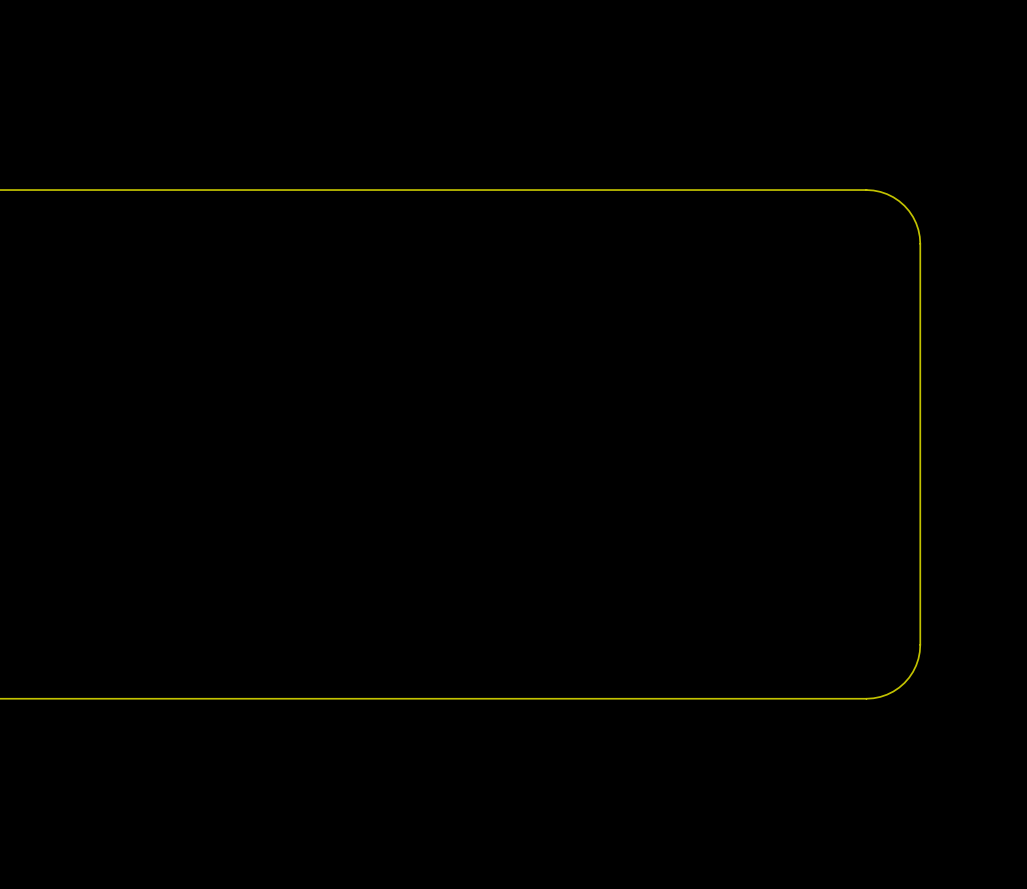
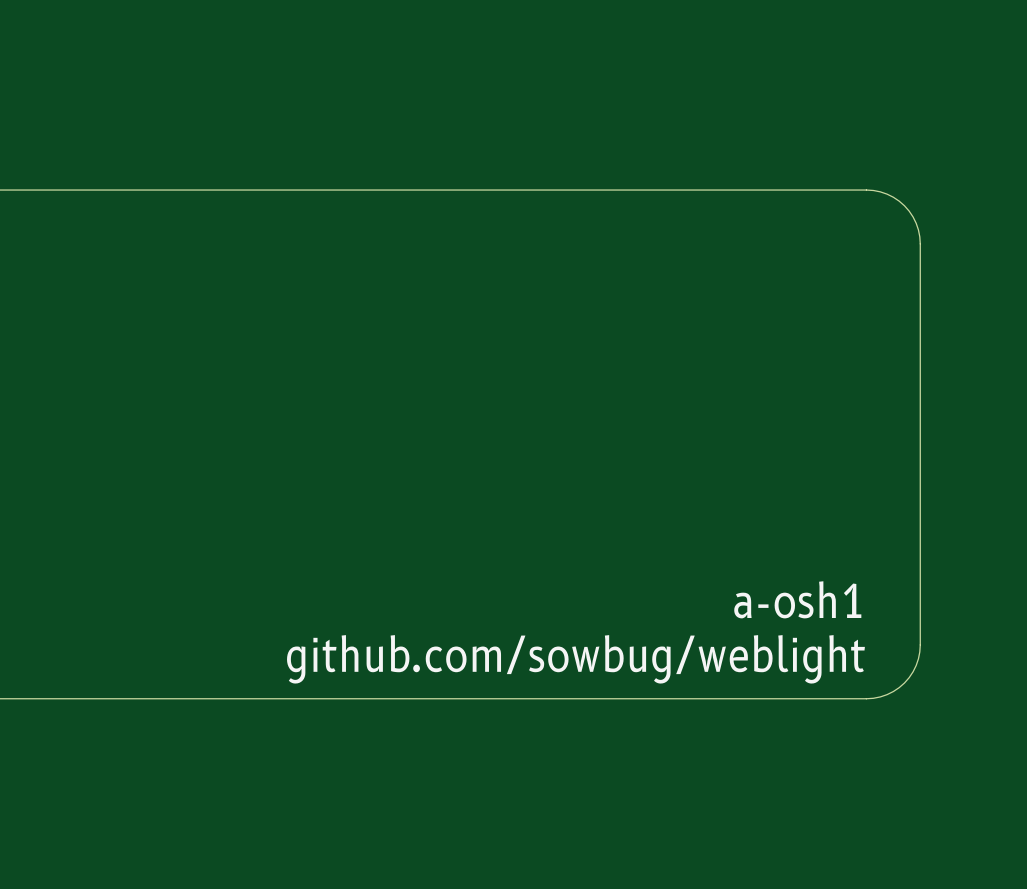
text: none -> a-osh1 (797, 599)
text: none -> github.com/sowbug/weblight (575, 659)

